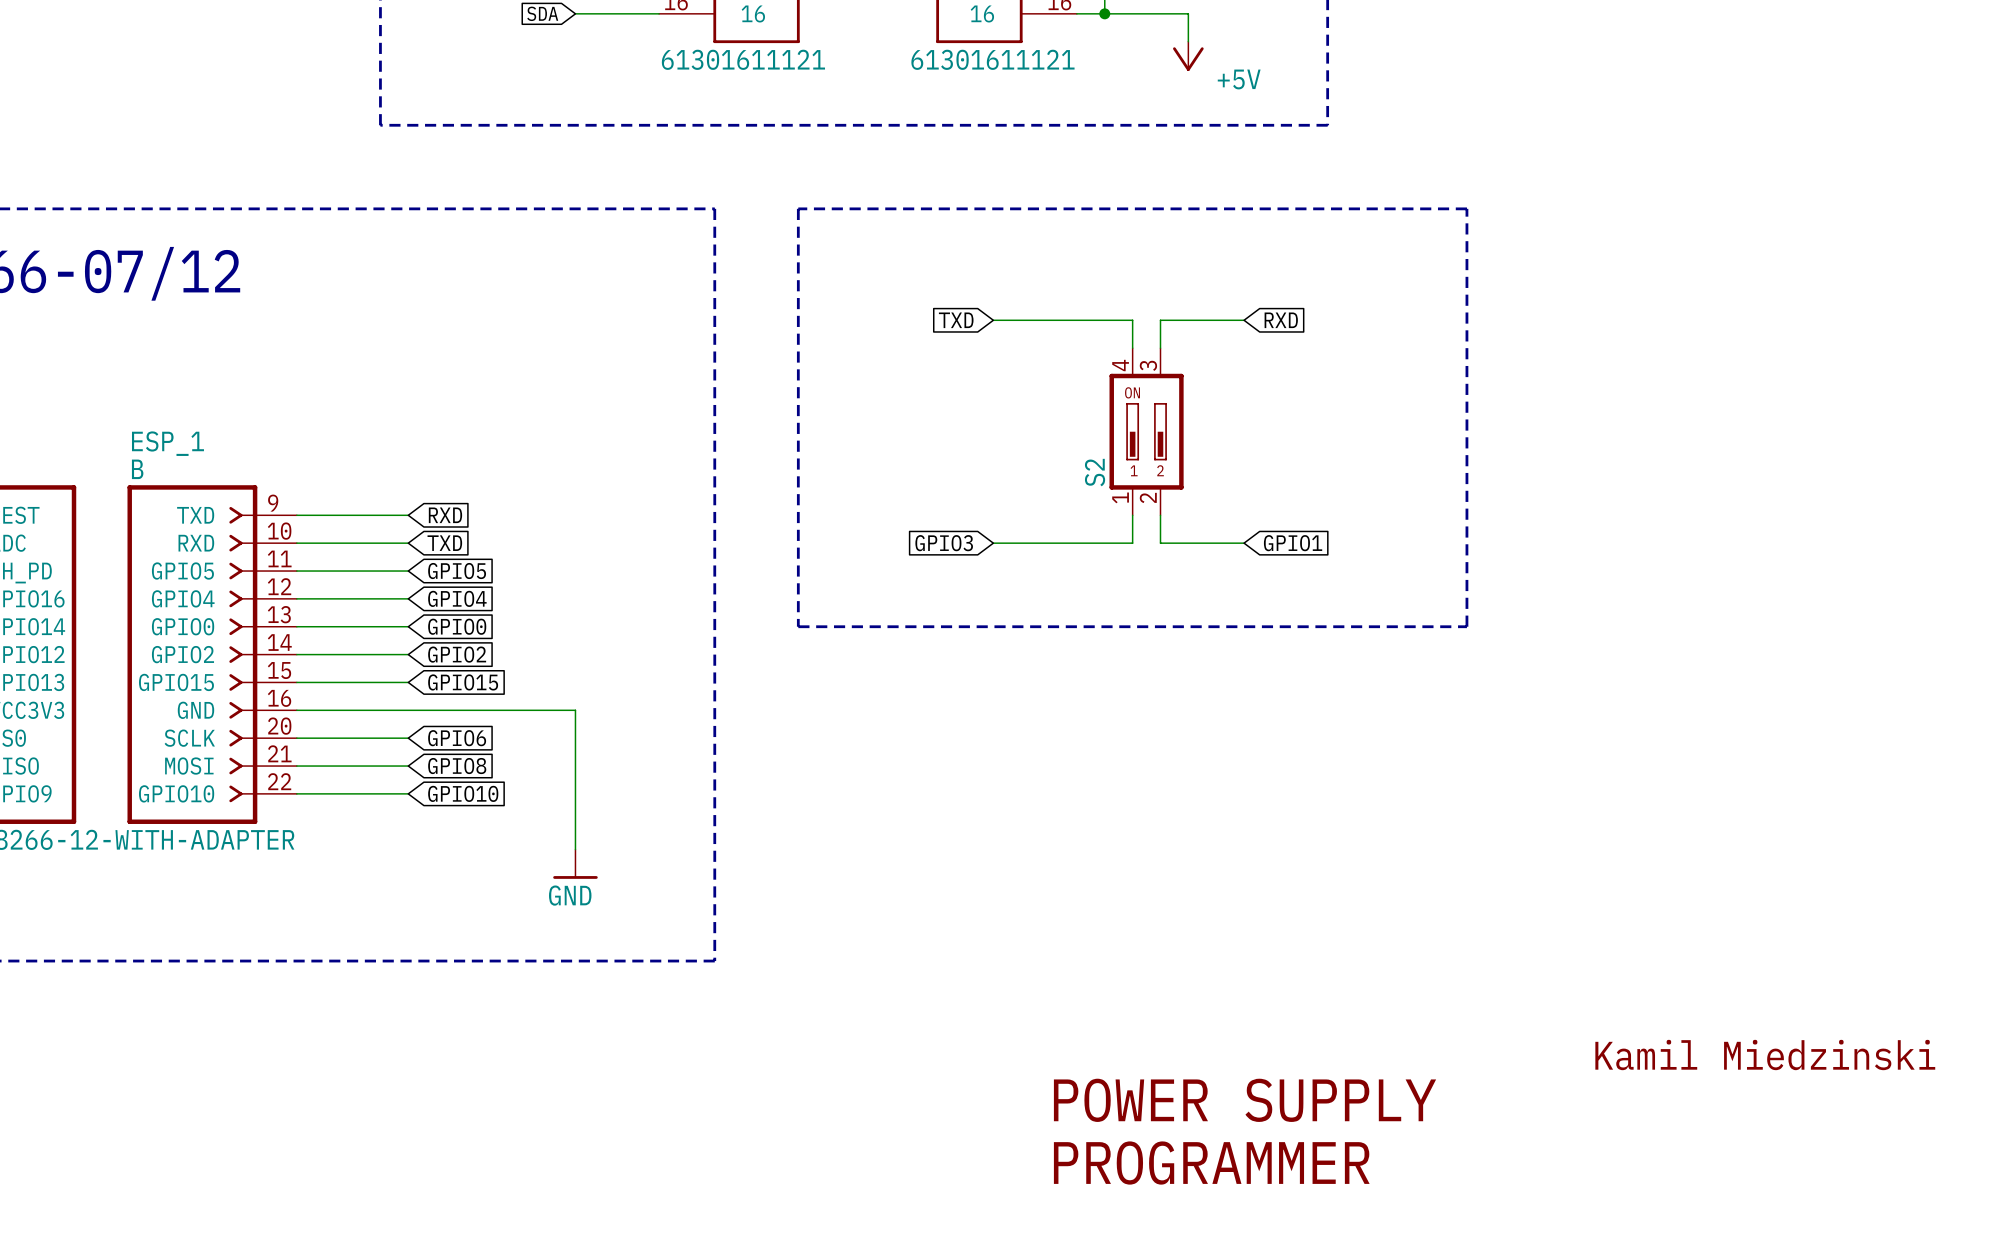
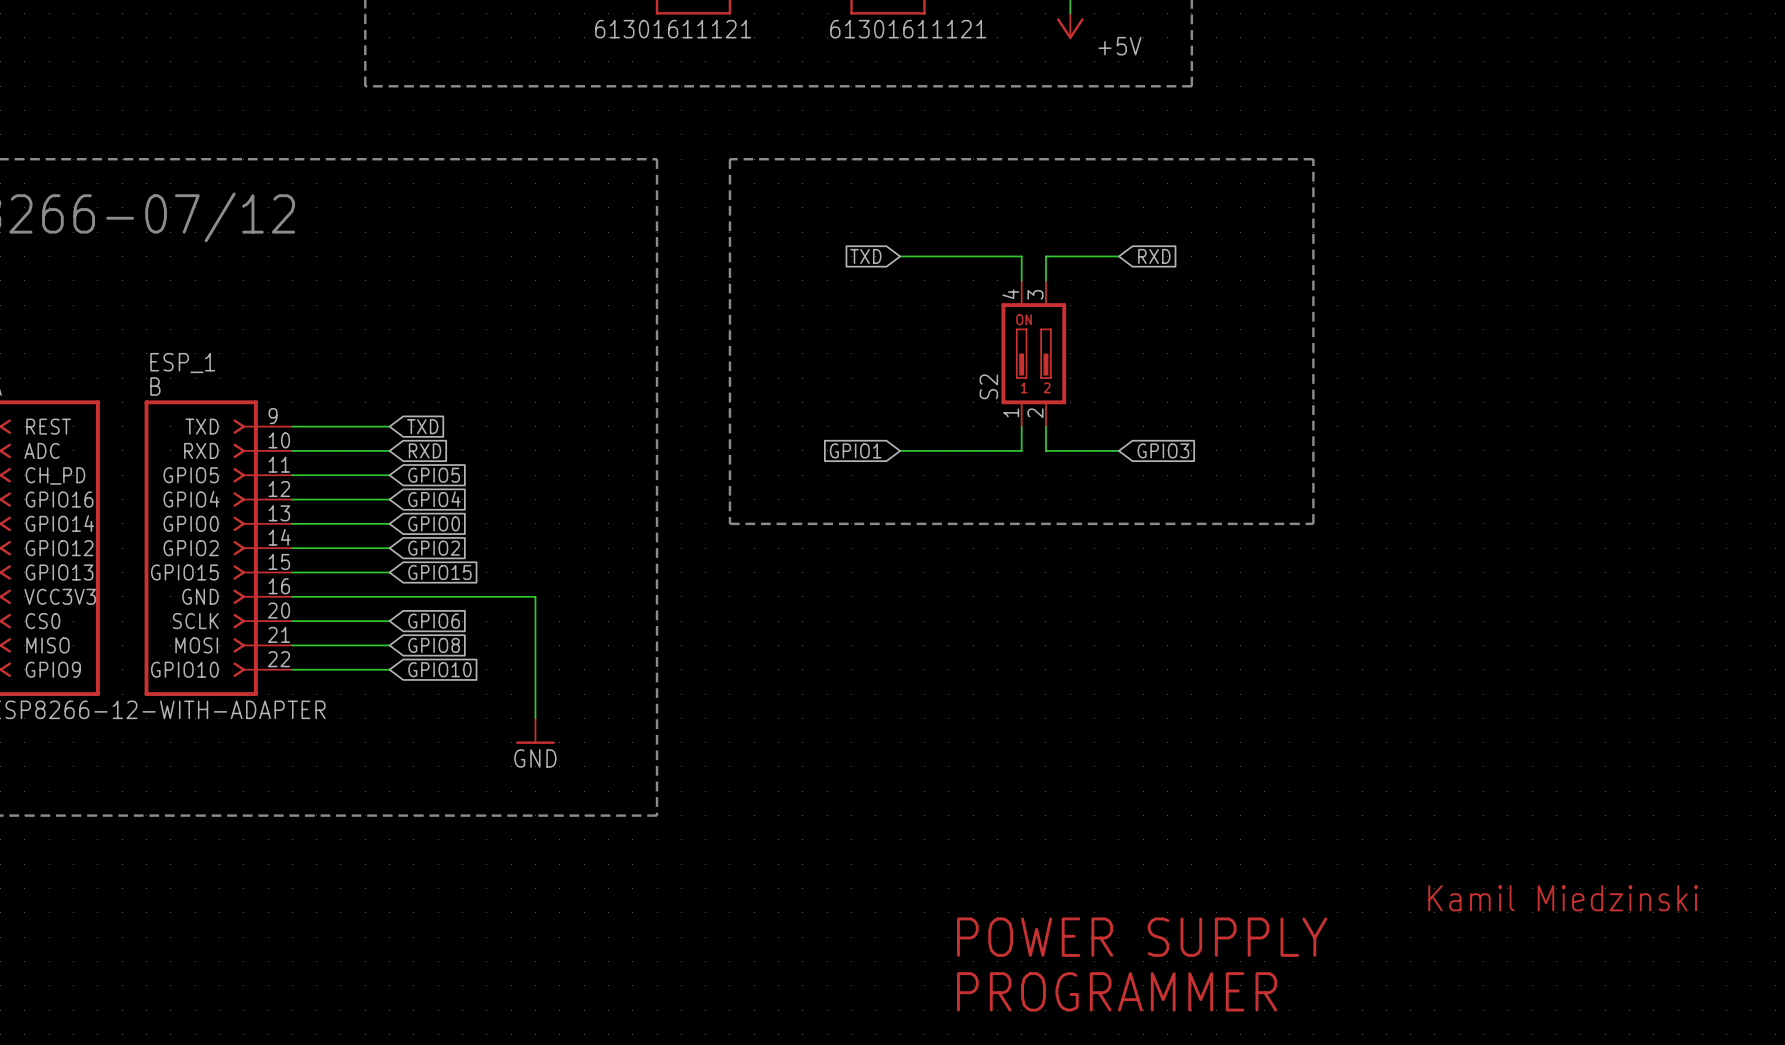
global label: RXD (445, 515) -> TXD (422, 426)
global label: TXD (444, 543) -> RXD (425, 450)
global label: GPIO3 (944, 543) -> GPIO1 (855, 450)
global label: GPIO1 (1293, 543) -> GPIO3 (1163, 450)

